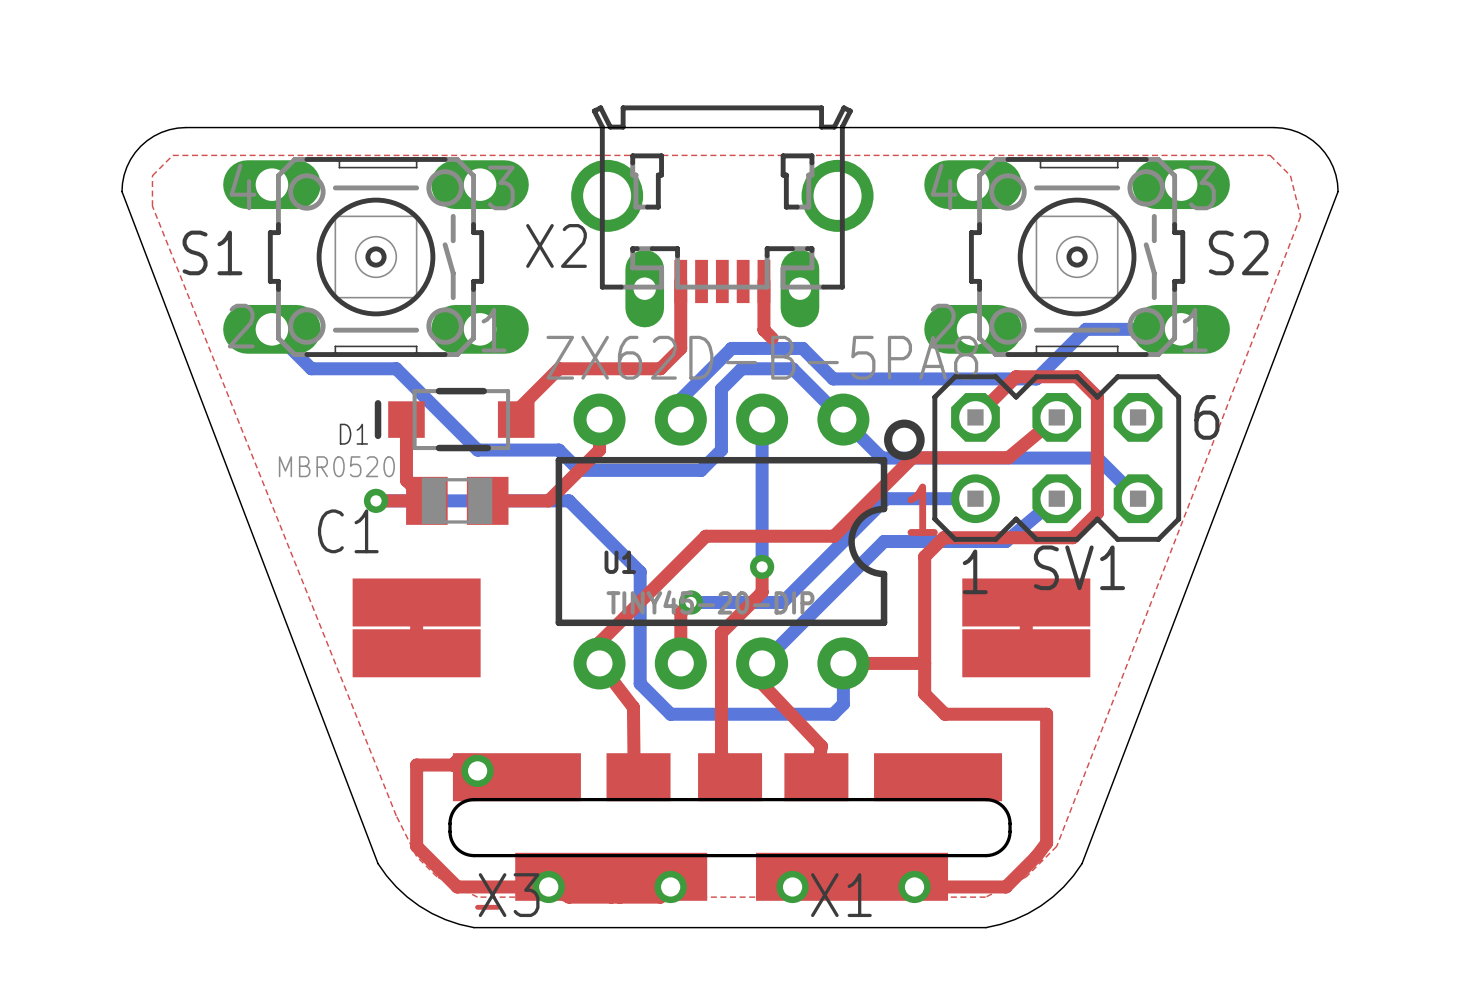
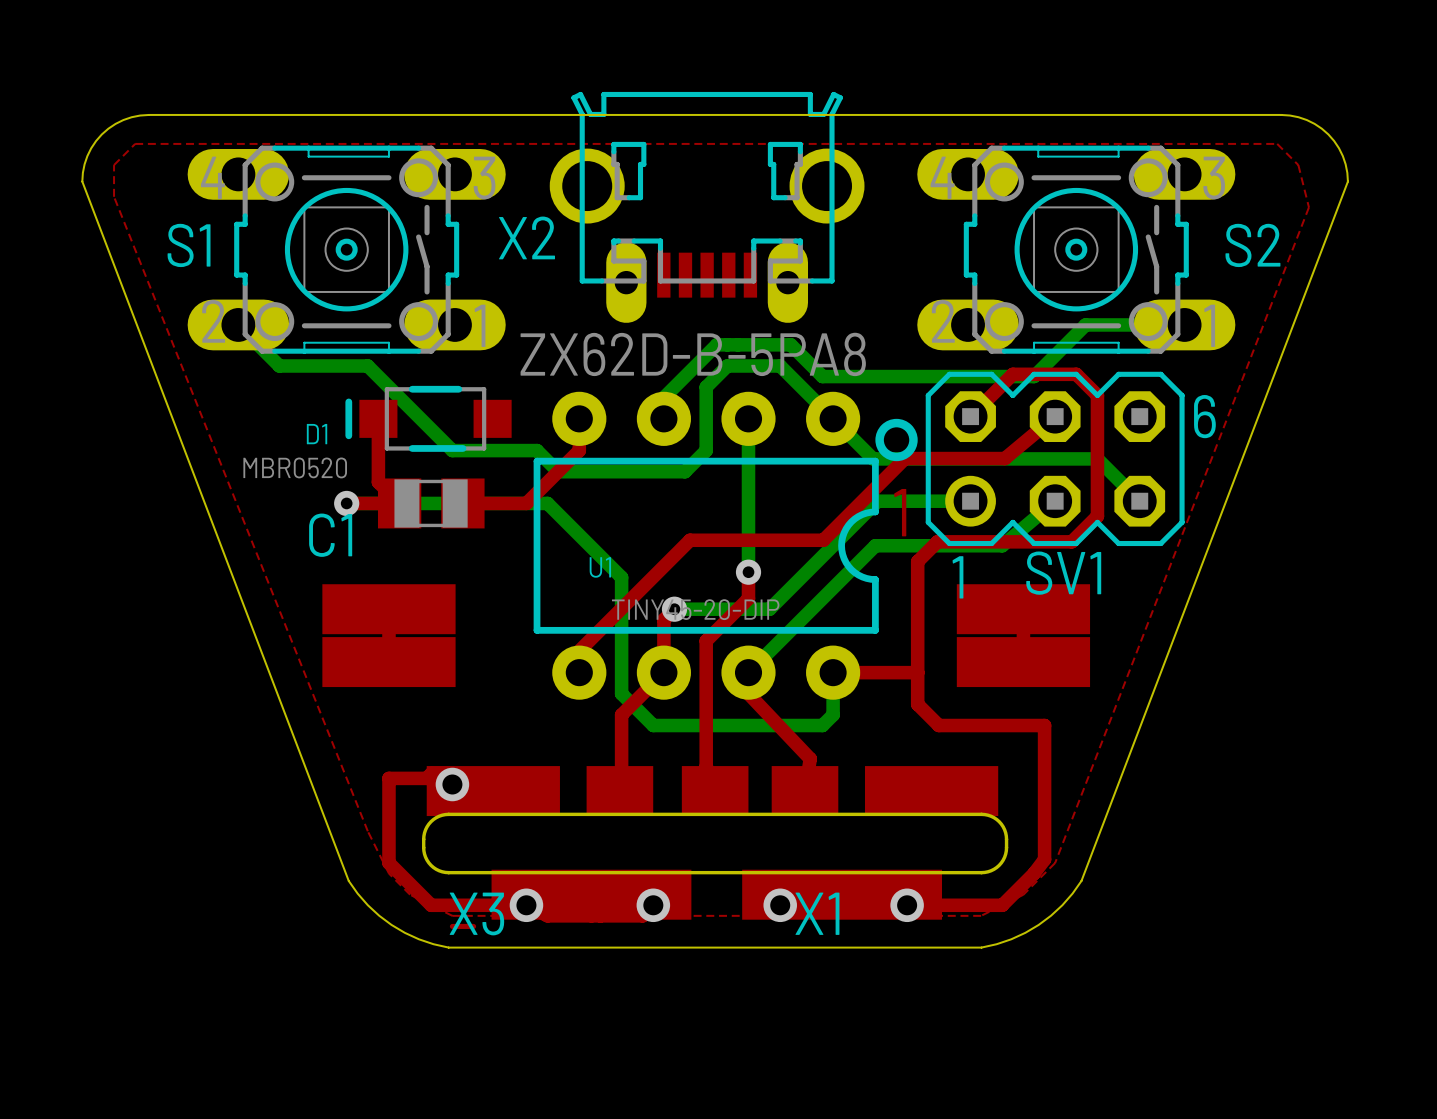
top track: (680, 281) (680, 348) (660, 368) (558, 368) (516, 411) (516, 419) -> none
top track: (763, 281) (763, 329) (772, 338) -> none
top track: (599, 642) (599, 663) (633, 707) (634, 772) (638, 777) -> (663, 672) (621, 714) (621, 789) (619, 791)

